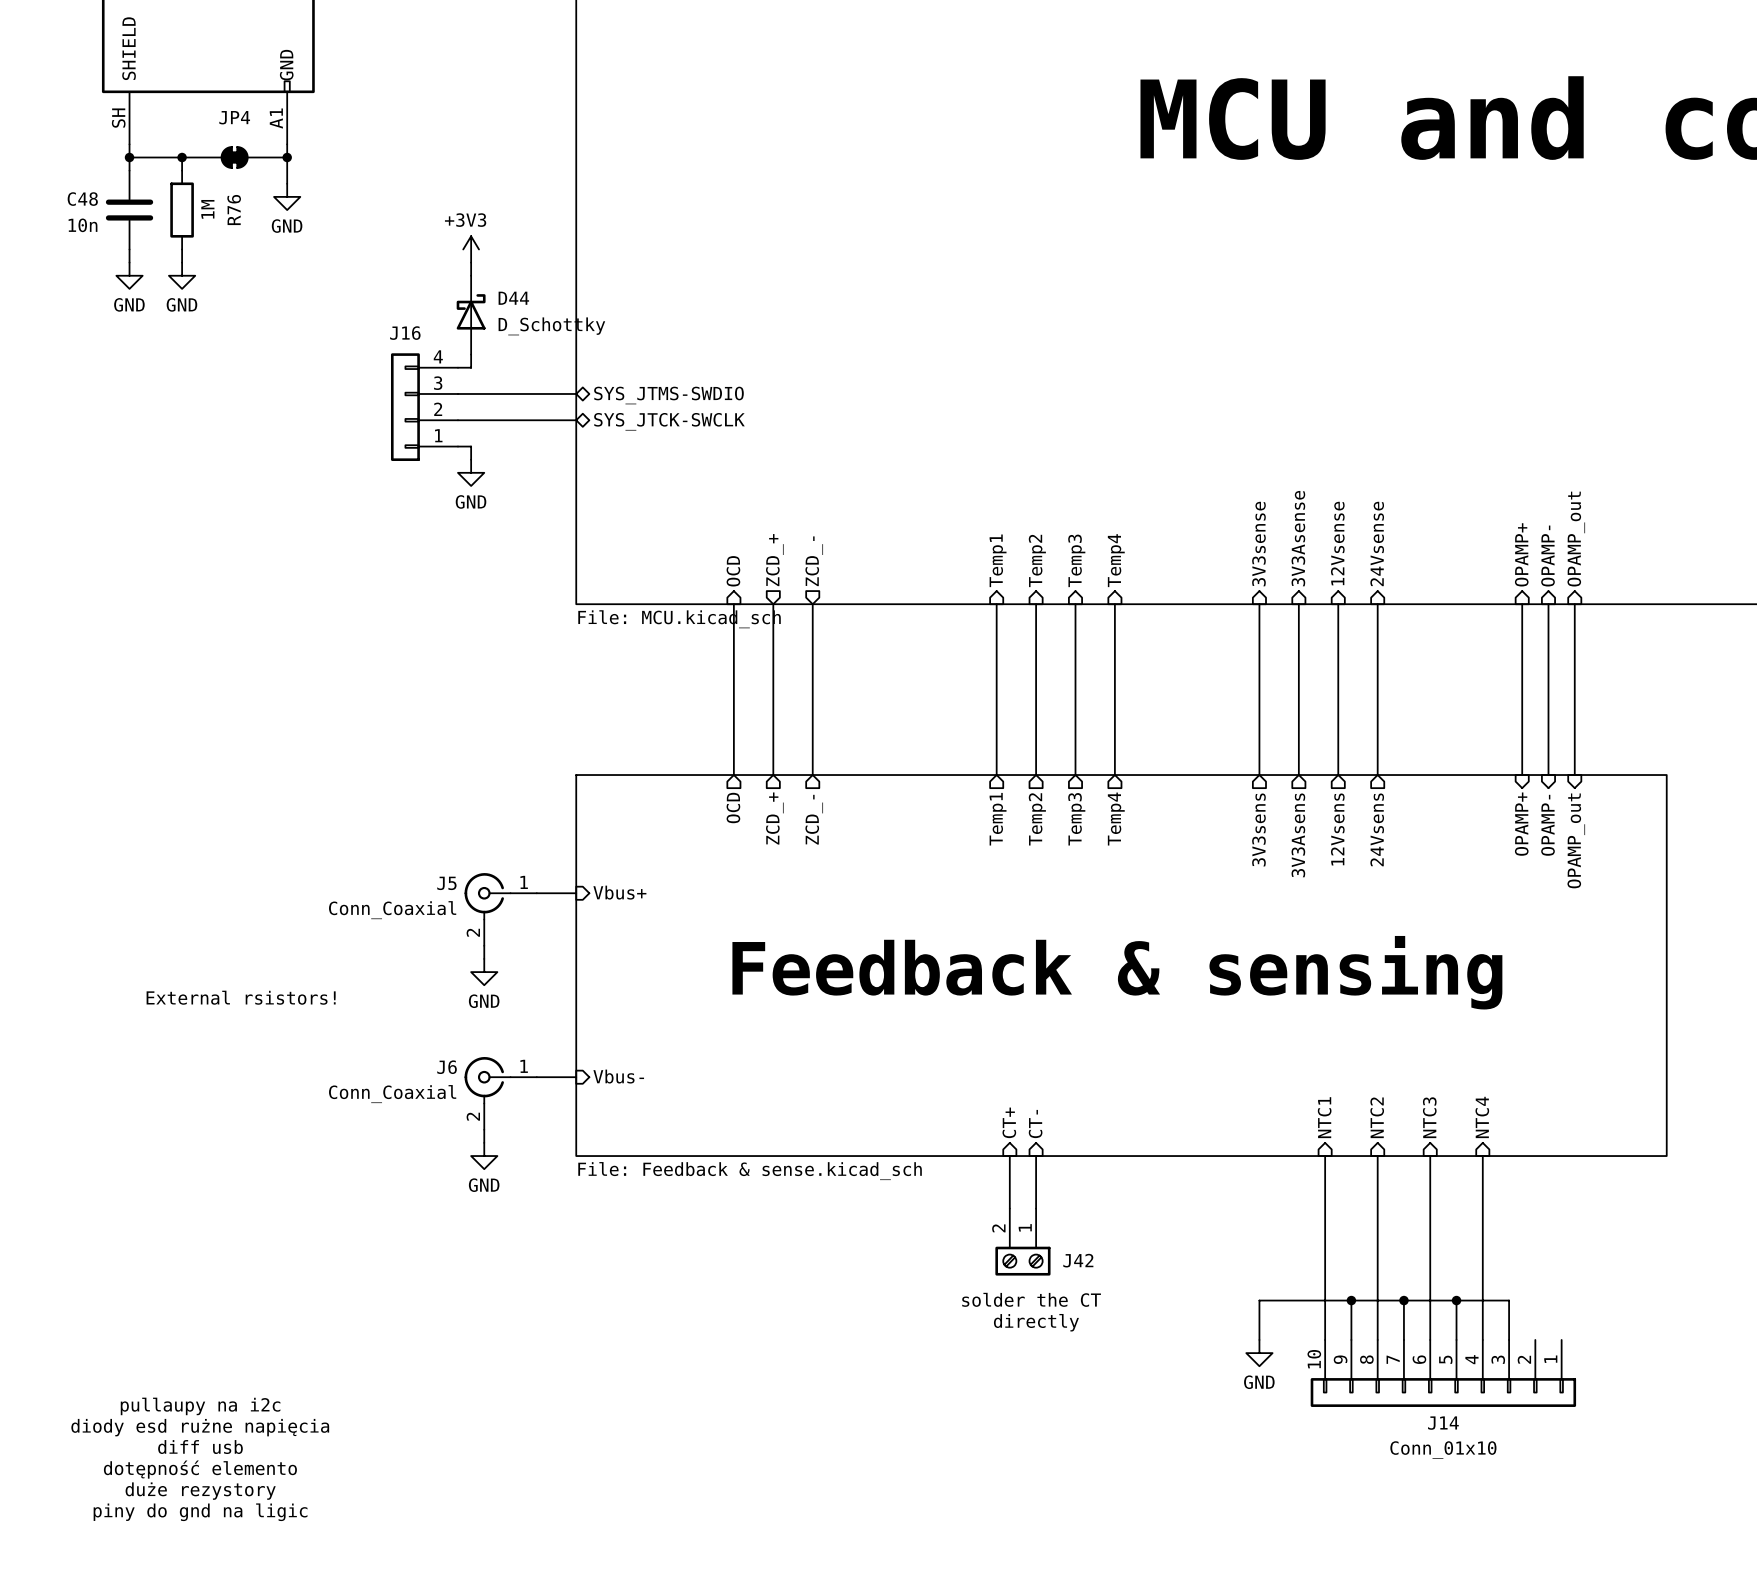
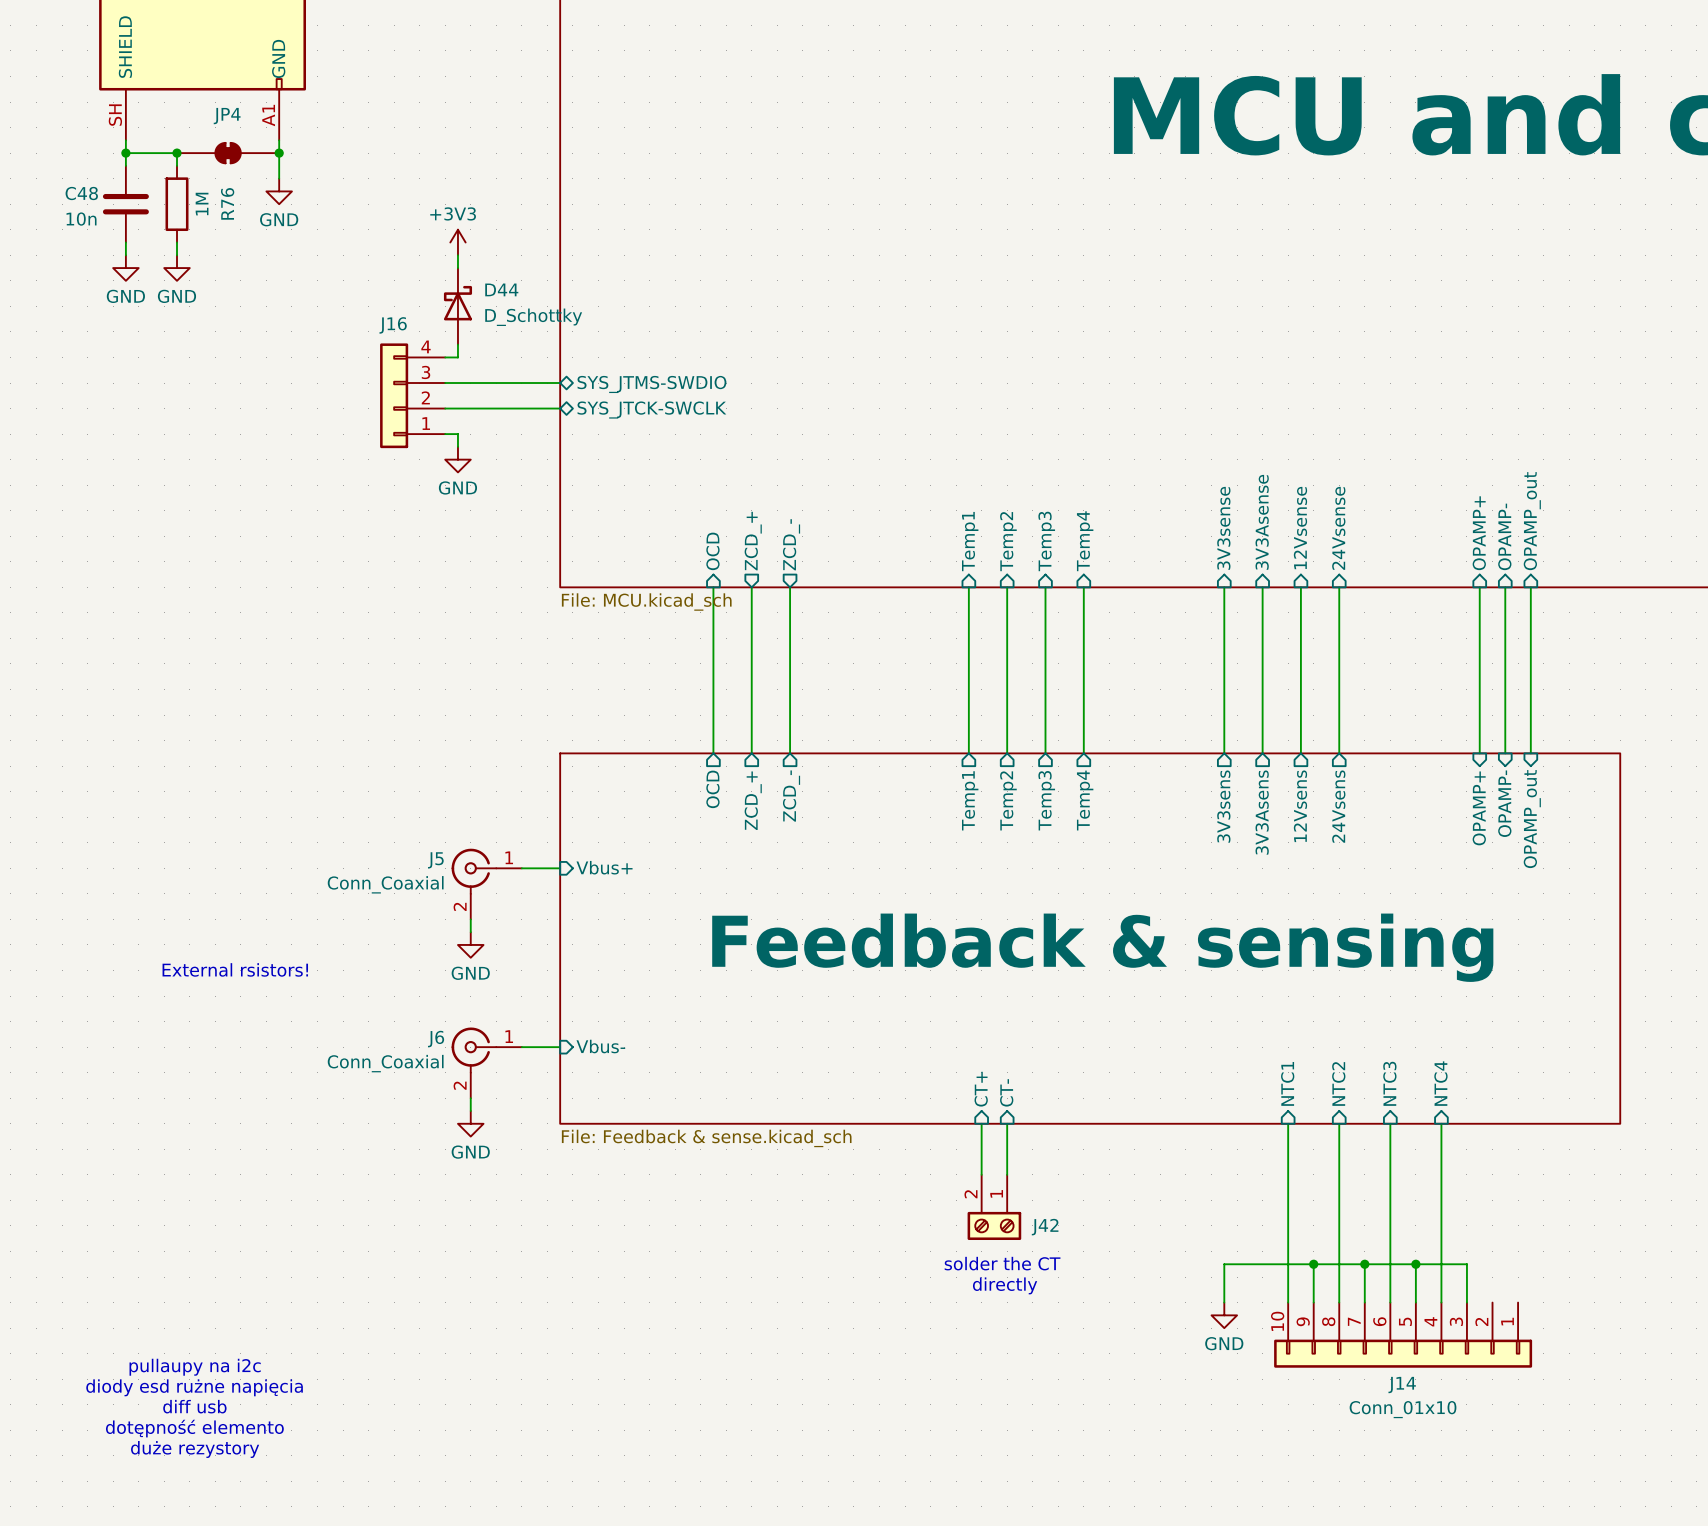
text: piny do gnd na ligic (200, 1512) -> none

